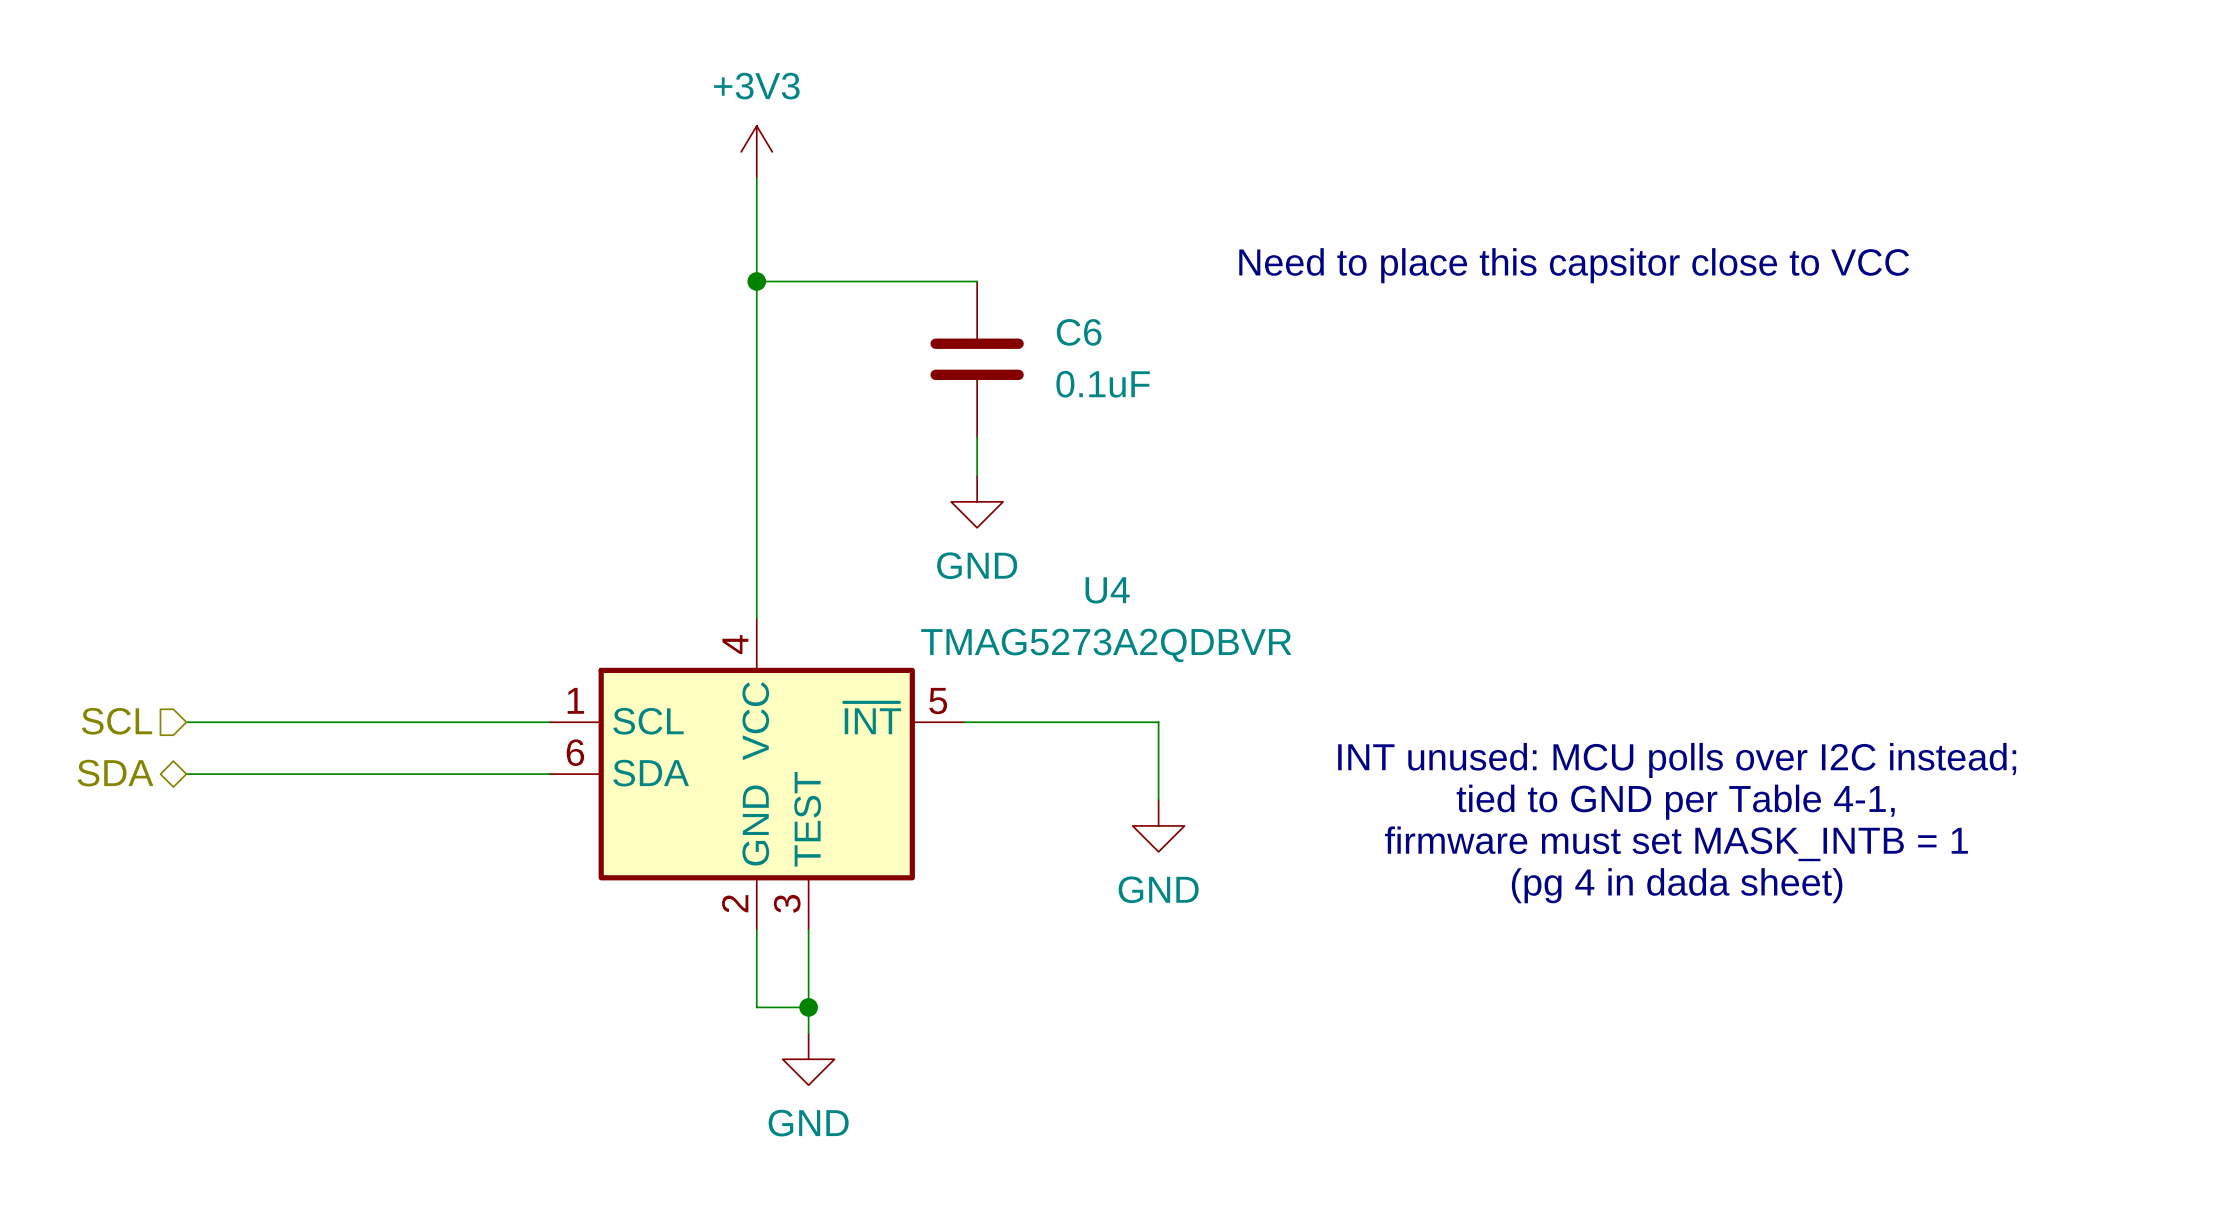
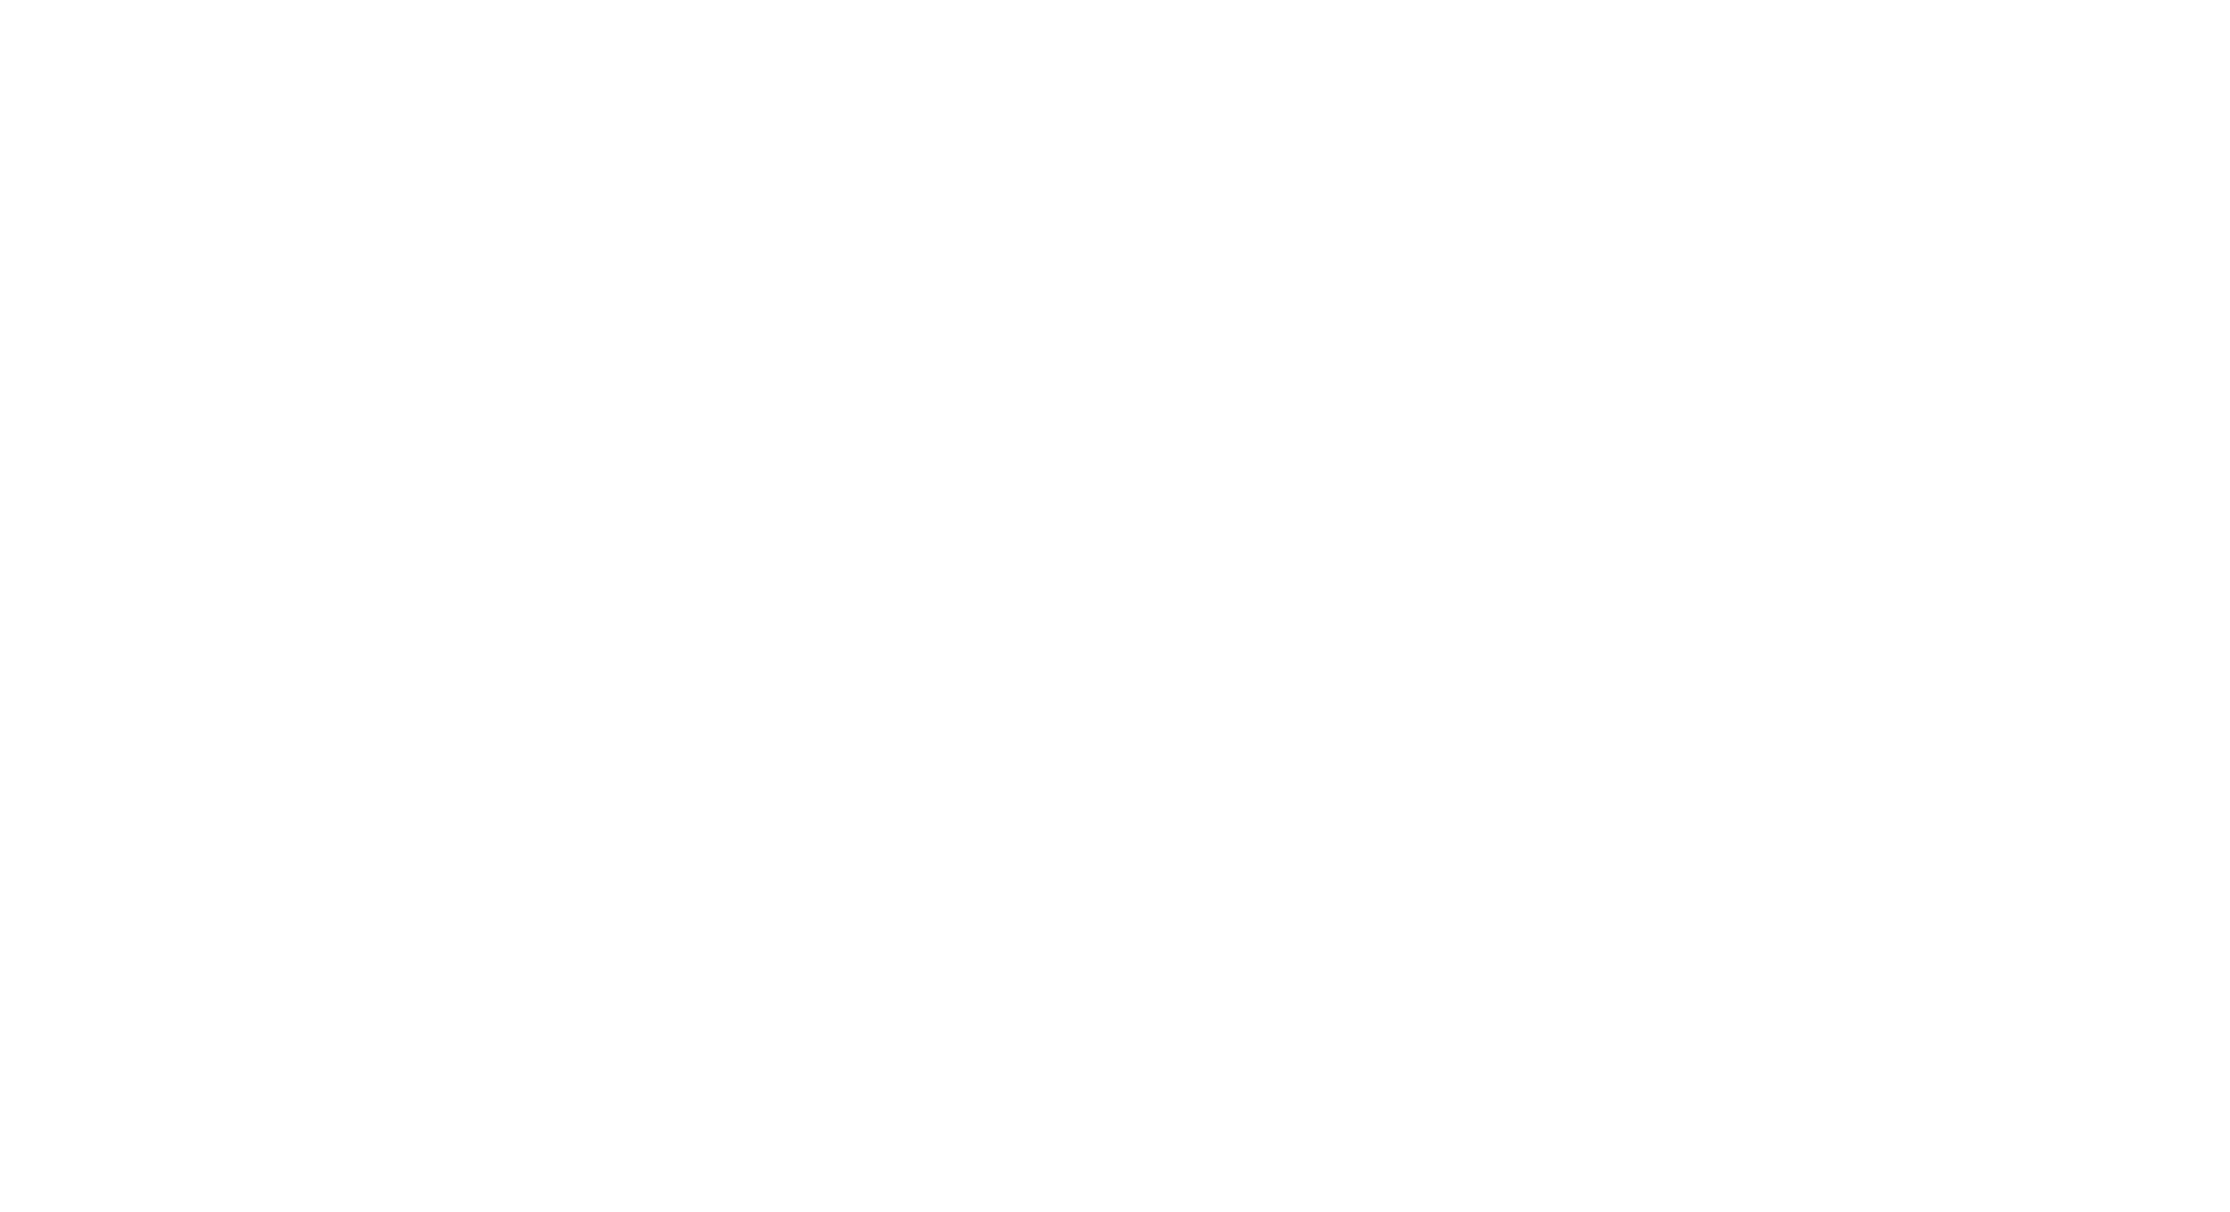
power symbol: +3V3 (756, 151) -> none
wire: (756, 177) (756, 618) -> none
text: Need to place this capsitor close to VCC (1574, 265) -> none
wire: (756, 281) (977, 281) -> none
junction: (756, 281) -> none
C6: 0.1uF (977, 359) -> none
wire: (977, 437) (977, 475) -> none
power symbol: GND (977, 501) -> none
hierarchical label: SCL (117, 721) -> none
wire: (186, 722) (549, 722) -> none
wire: (964, 722) (1158, 722) (1158, 800) -> none
text: INT unused: MCU polls over I2C instead; (1677, 760) -> none
hierarchical label: SDA (115, 773) -> none
wire: (186, 774) (549, 774) -> none
U4: TMAG5273A2QDBVR (756, 774) -> none
text: tied to GND per Table 4-1, (1675, 802) -> none
power symbol: GND (1158, 825) -> none
text: firmware must set MASK_INTB = 1 (1676, 843) -> none
text: (pg 4 in dada sheet) (1677, 885) -> none
wire: (756, 929) (756, 1007) (808, 1007) -> none
wire: (808, 929) (808, 1007) -> none
wire: (808, 1007) (808, 1033) -> none
junction: (808, 1007) -> none
power symbol: GND (808, 1059) -> none

